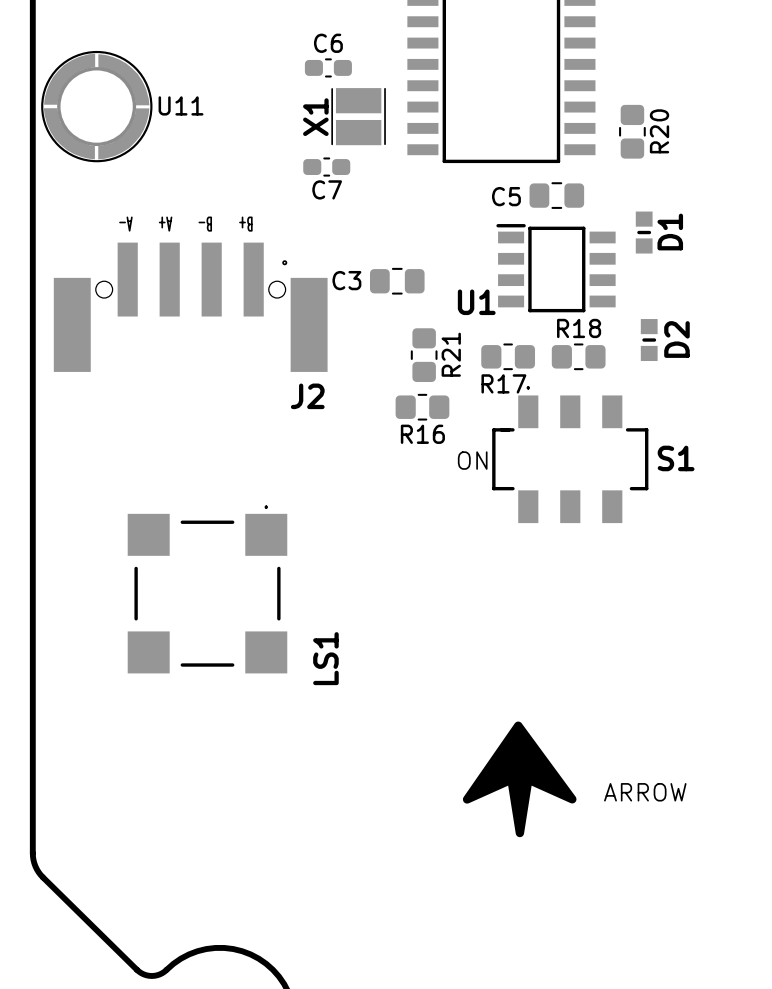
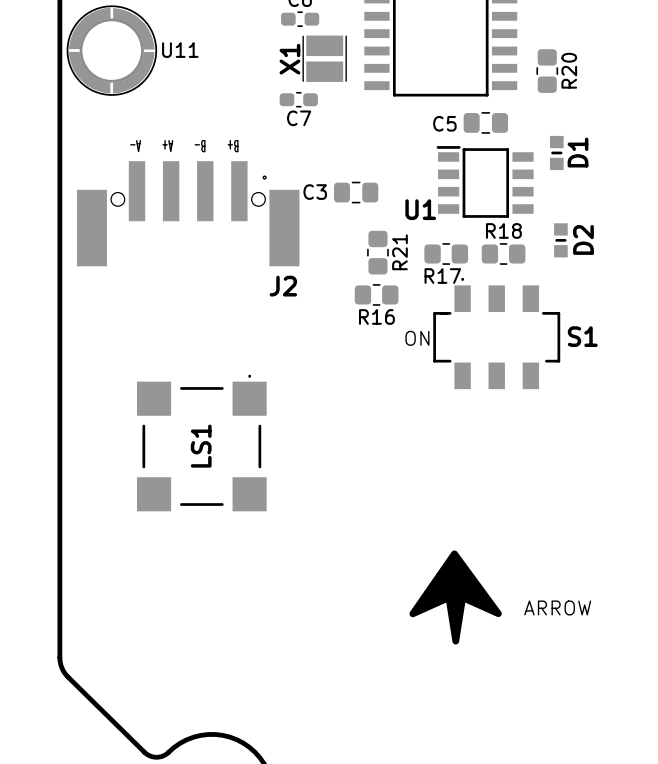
LS1 name position: LS1 (325, 658) -> LS1 (201, 446)

